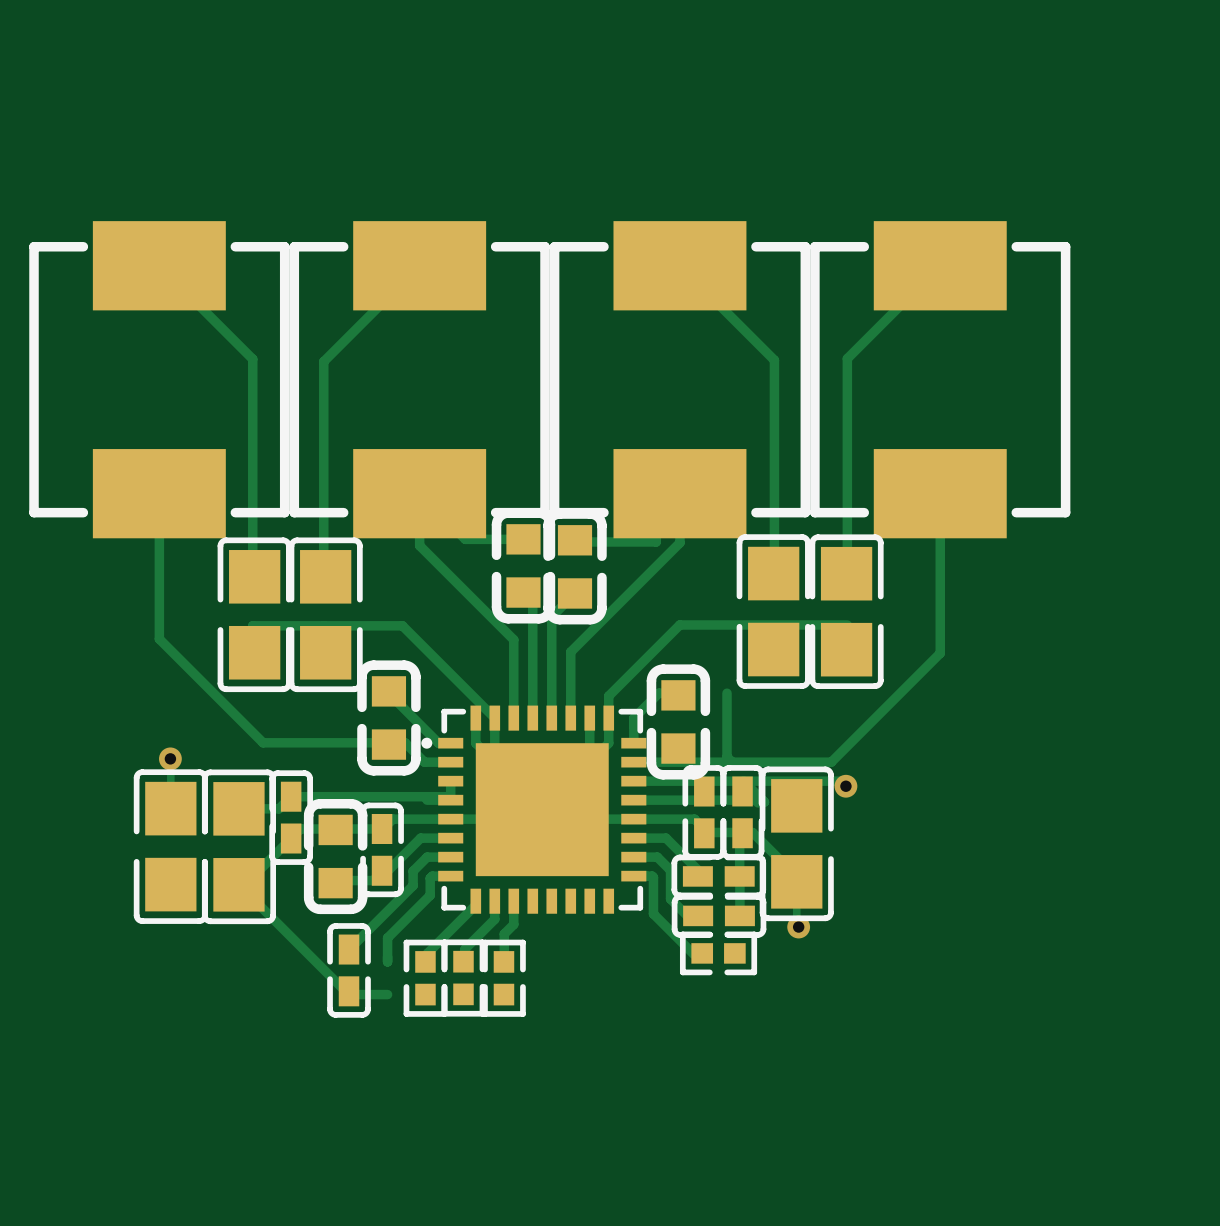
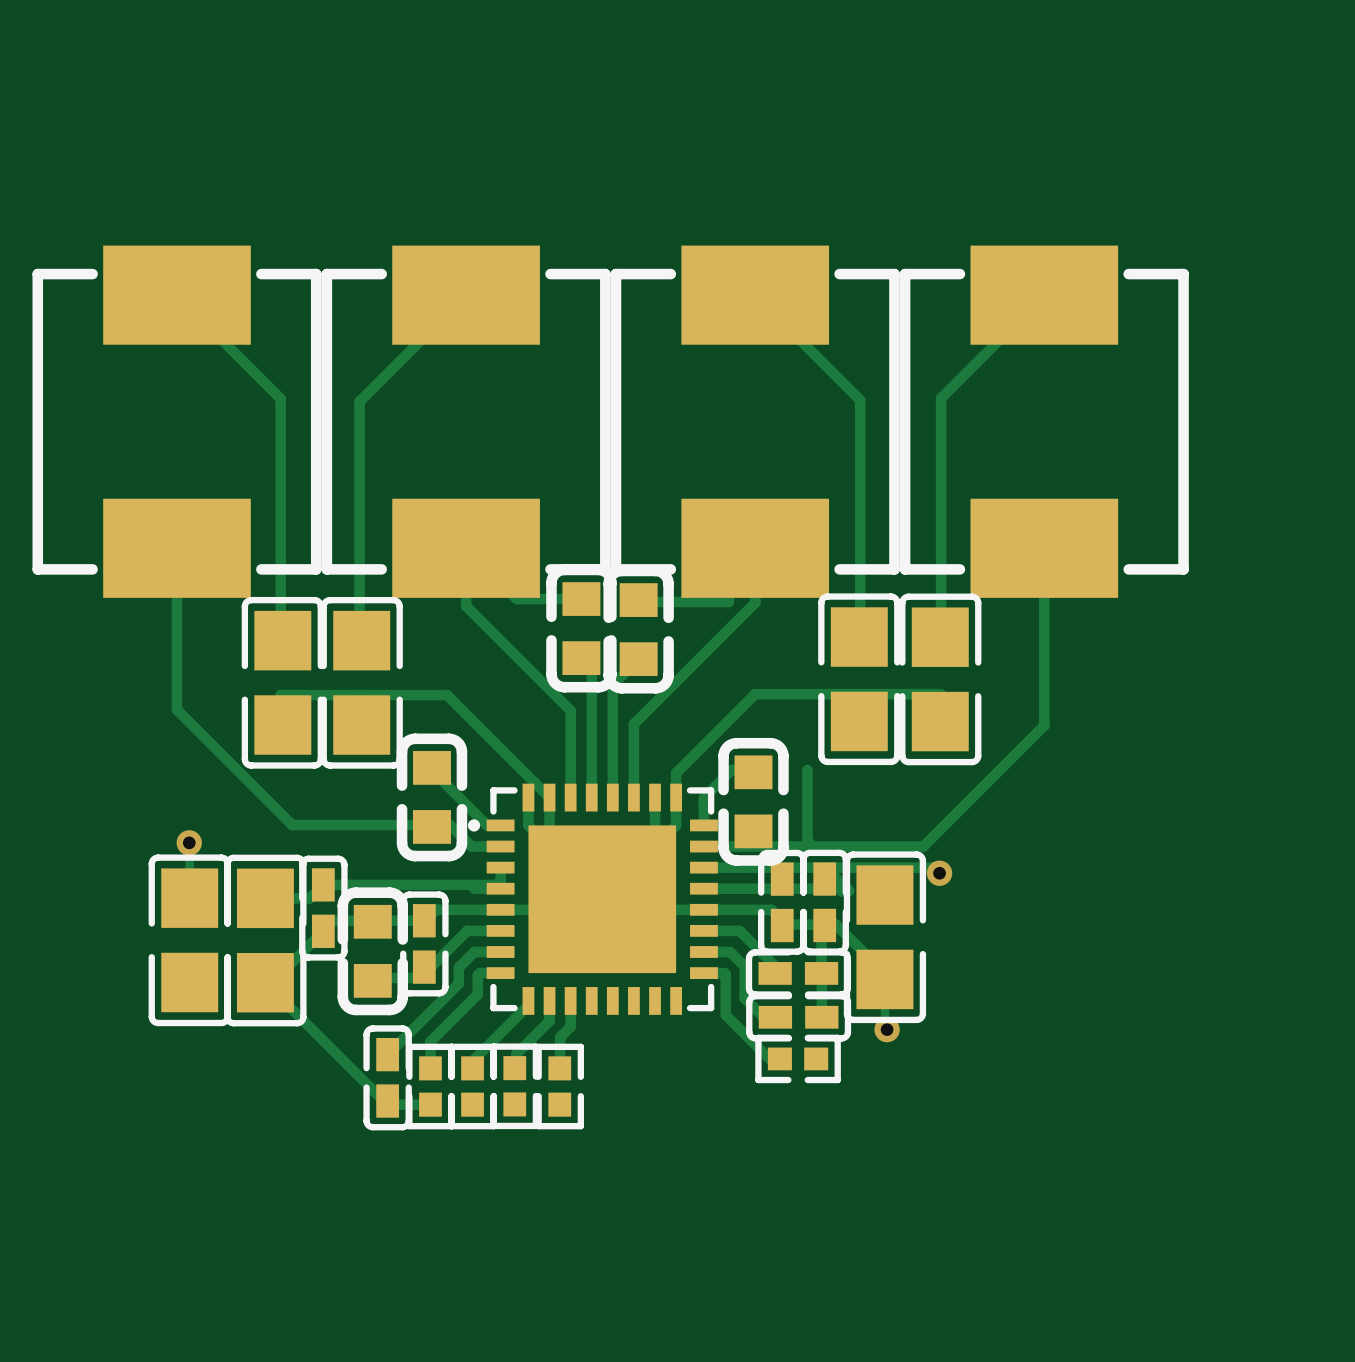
part: none -> (430, 1086)

